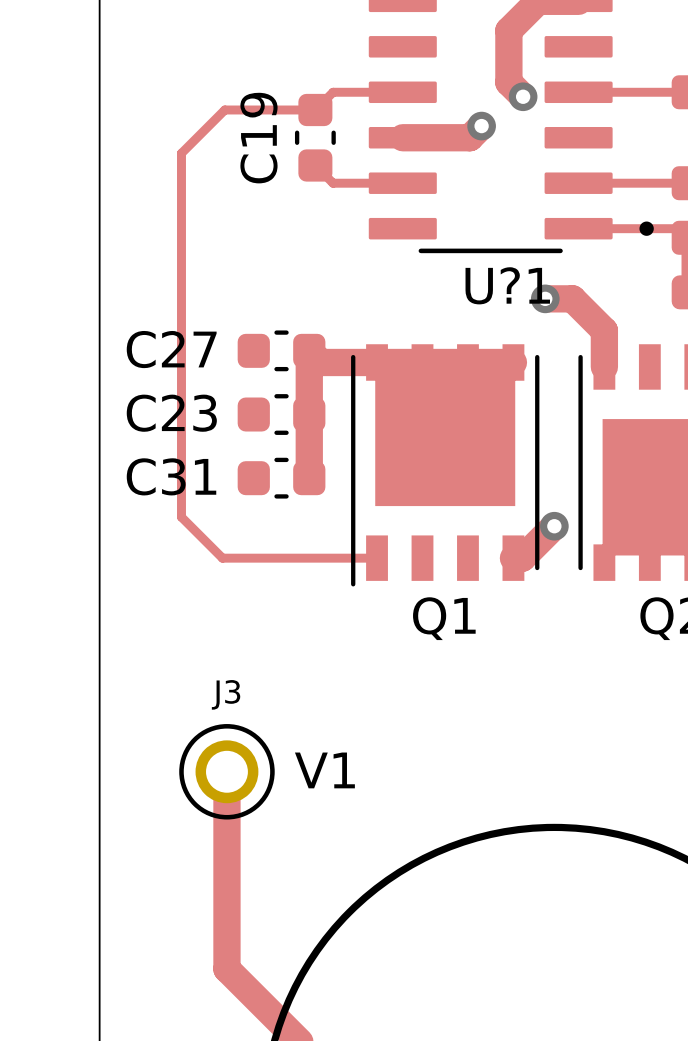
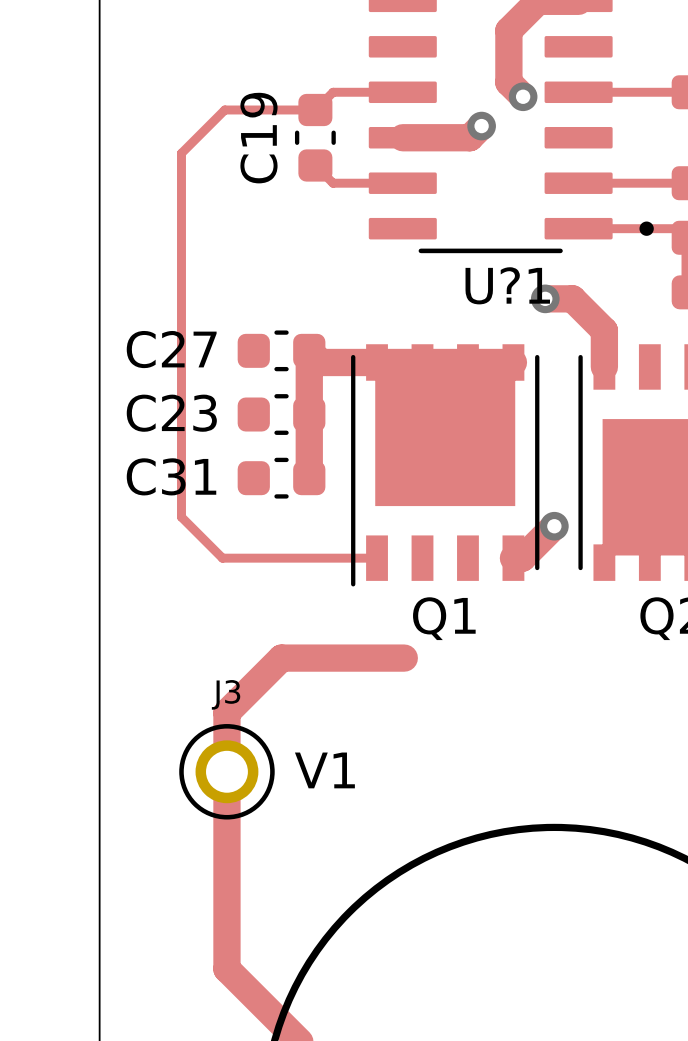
track: none -> (404, 658) (281, 658) (226, 712) (226, 771)

